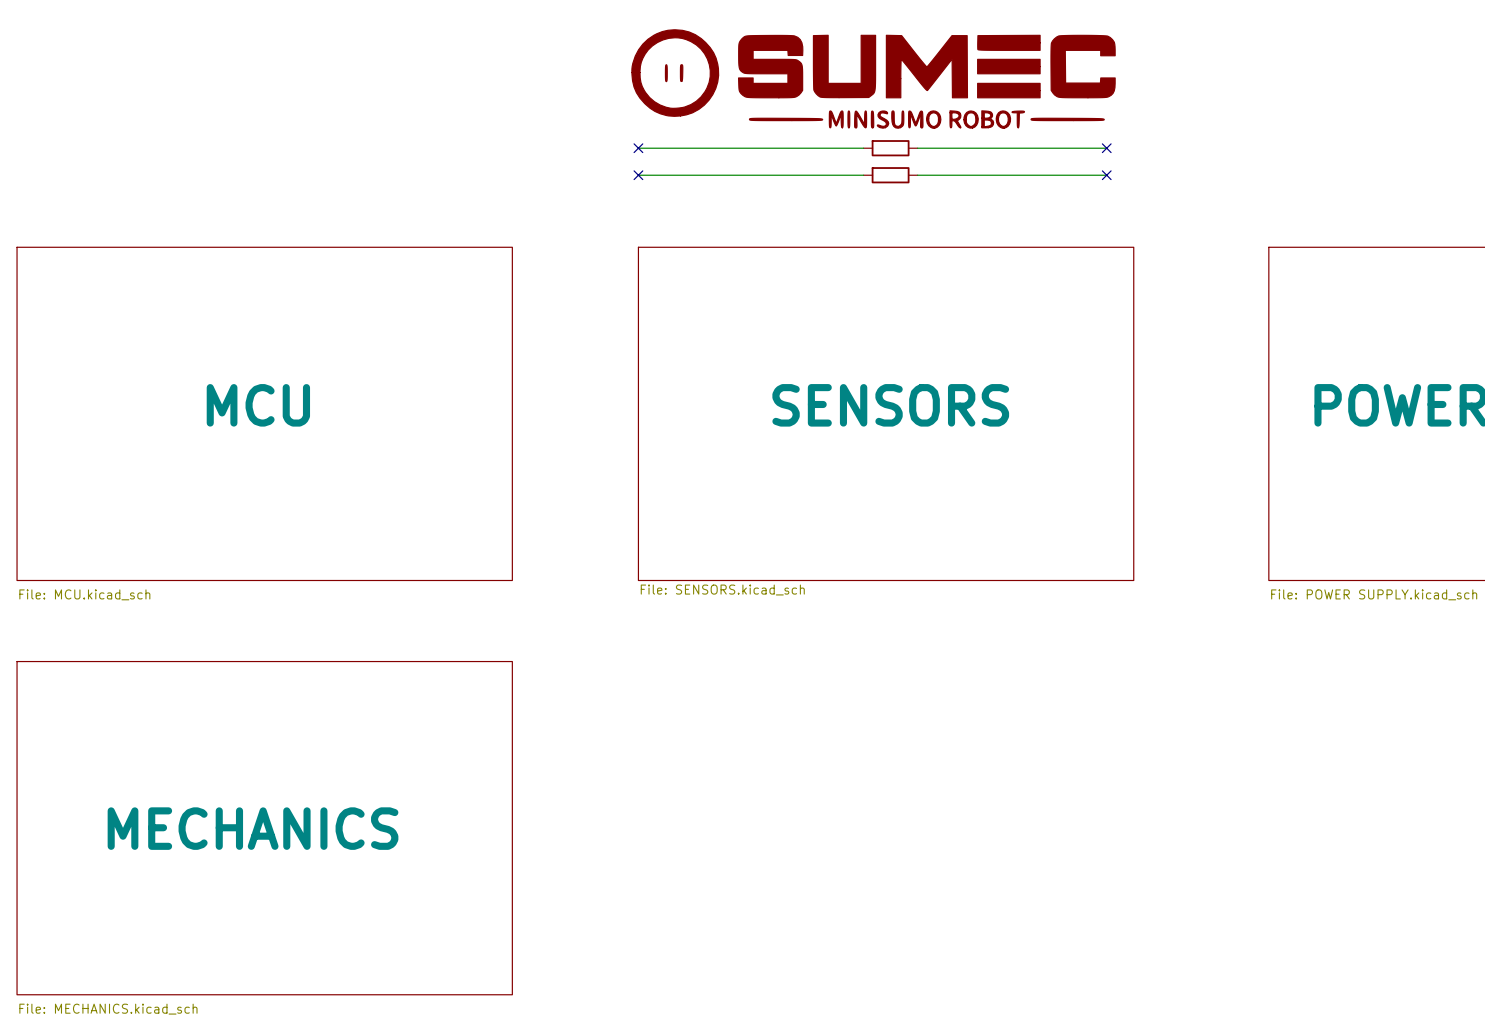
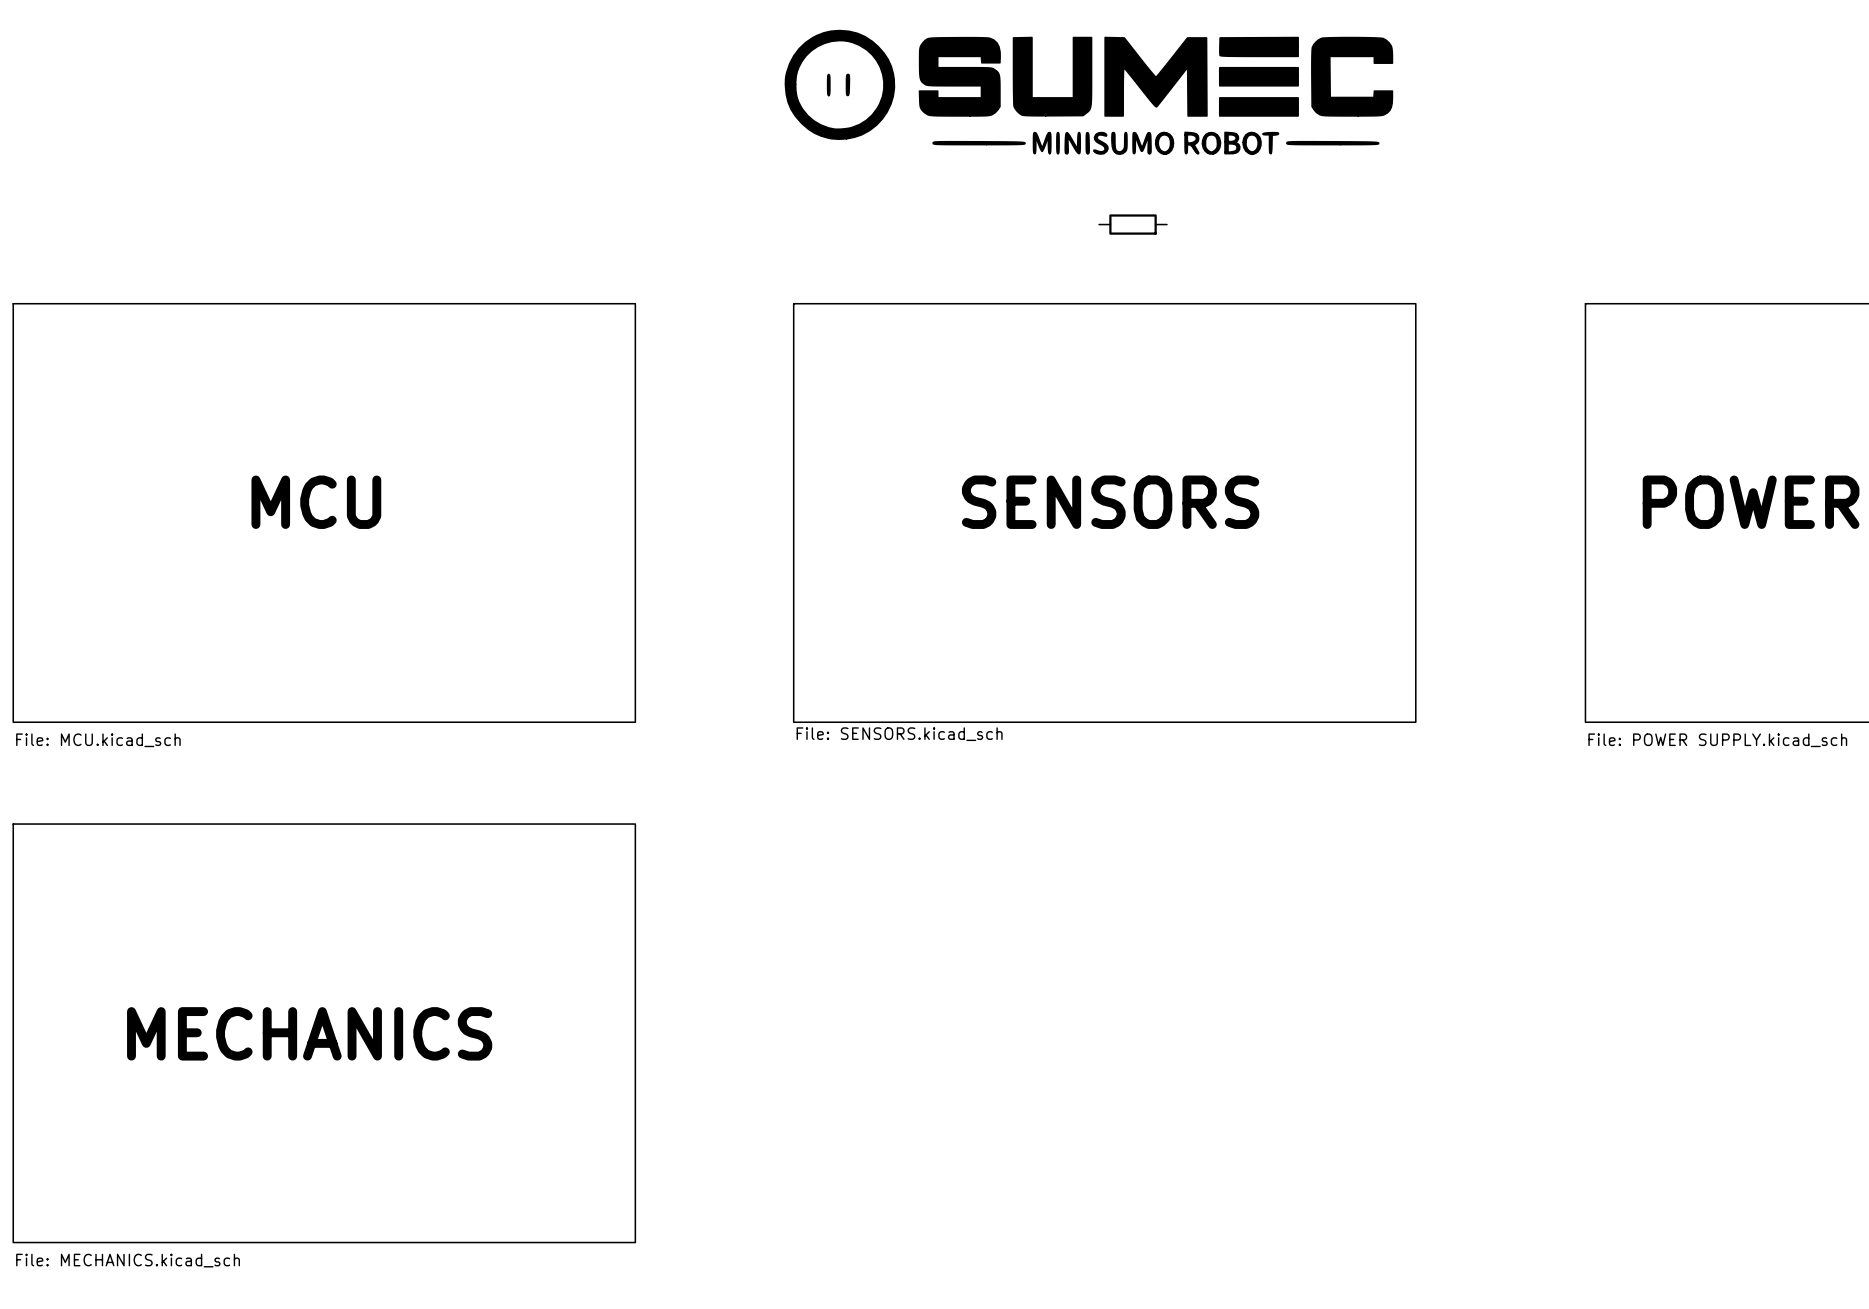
wire: (638, 148) (863, 148) -> none
no-connect mark: (638, 148) -> none
part: (890, 148) -> none
wire: (917, 148) (1106, 148) -> none
no-connect mark: (1106, 148) -> none
wire: (638, 175) (863, 175) -> none
no-connect mark: (638, 175) -> none
part: (890, 175) -> none
wire: (917, 175) (1106, 175) -> none
no-connect mark: (1106, 175) -> none
part: none -> (1133, 224)

